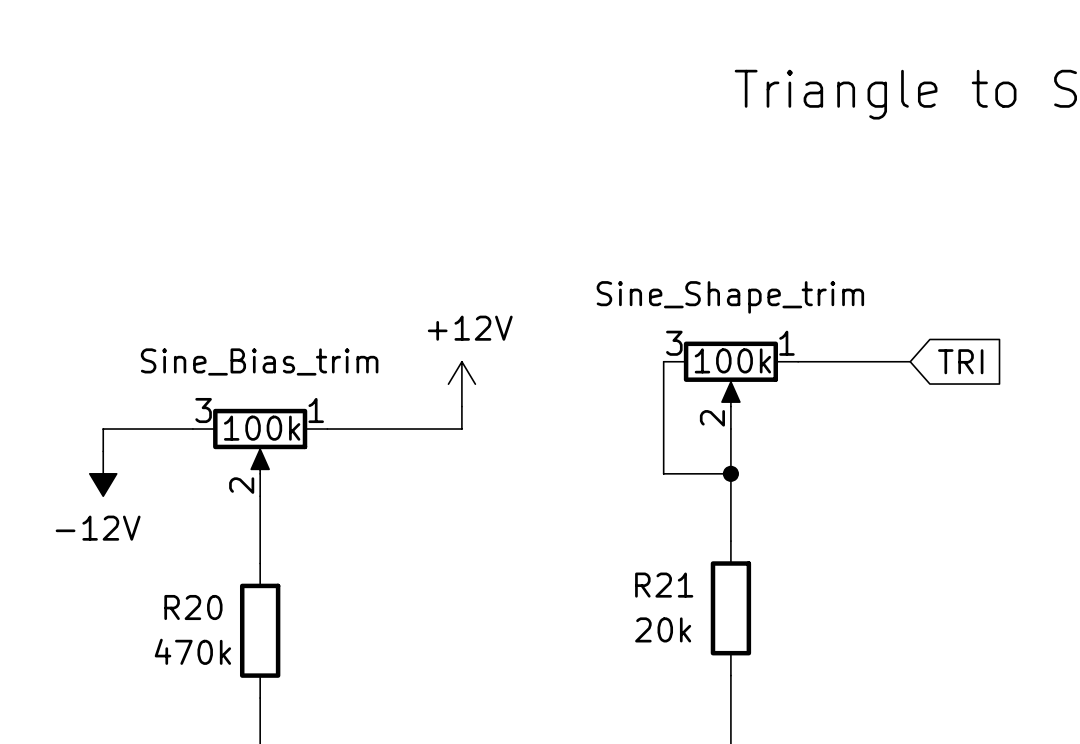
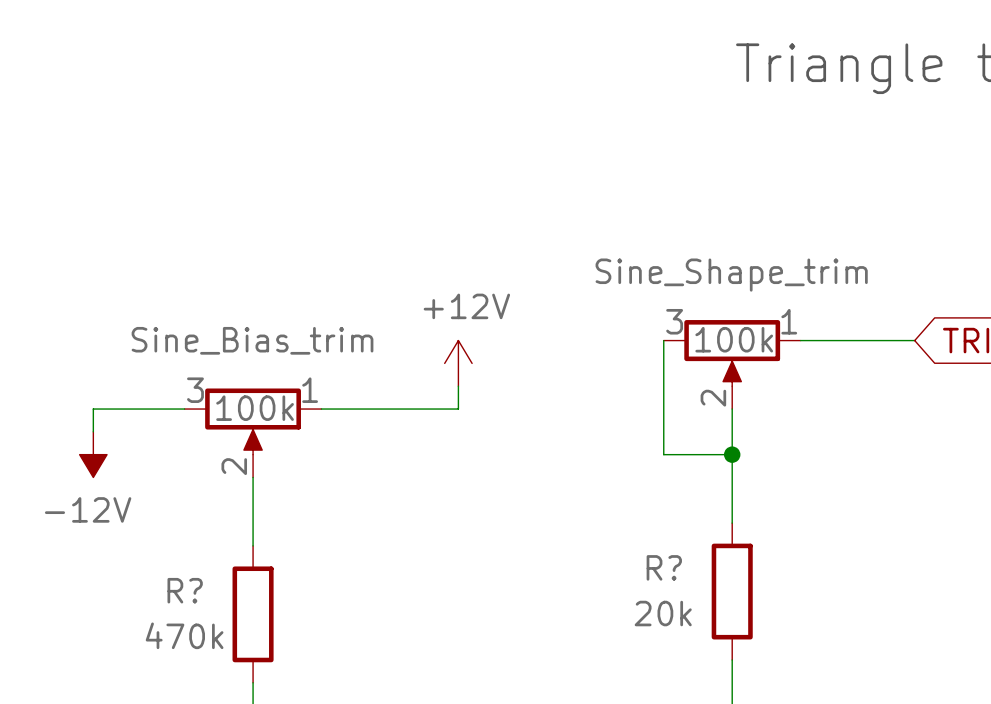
R21 name: R21 (664, 585) -> R? (664, 567)
R20 name: R20 (193, 607) -> R? (185, 590)

